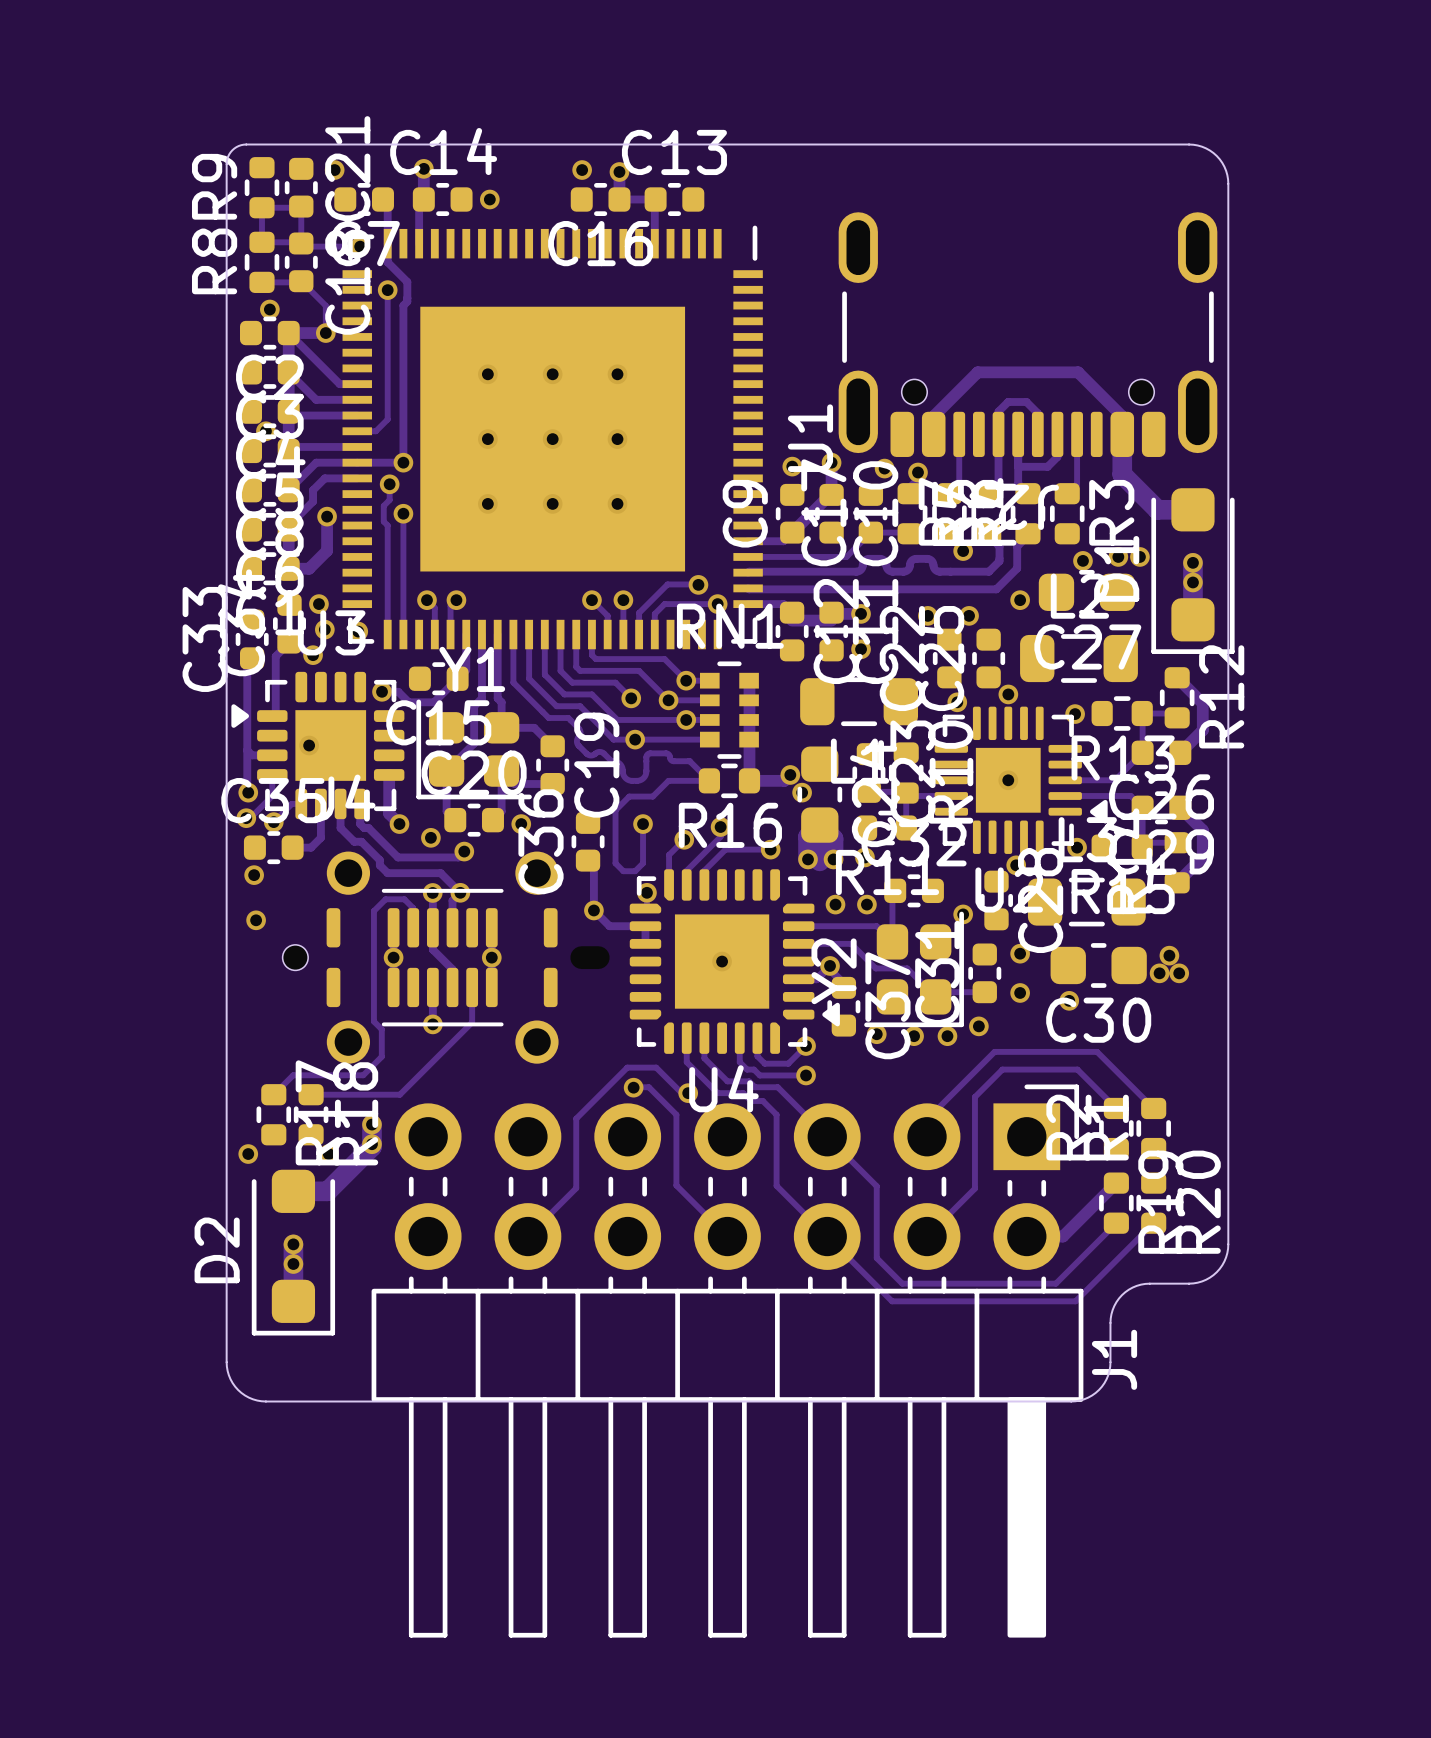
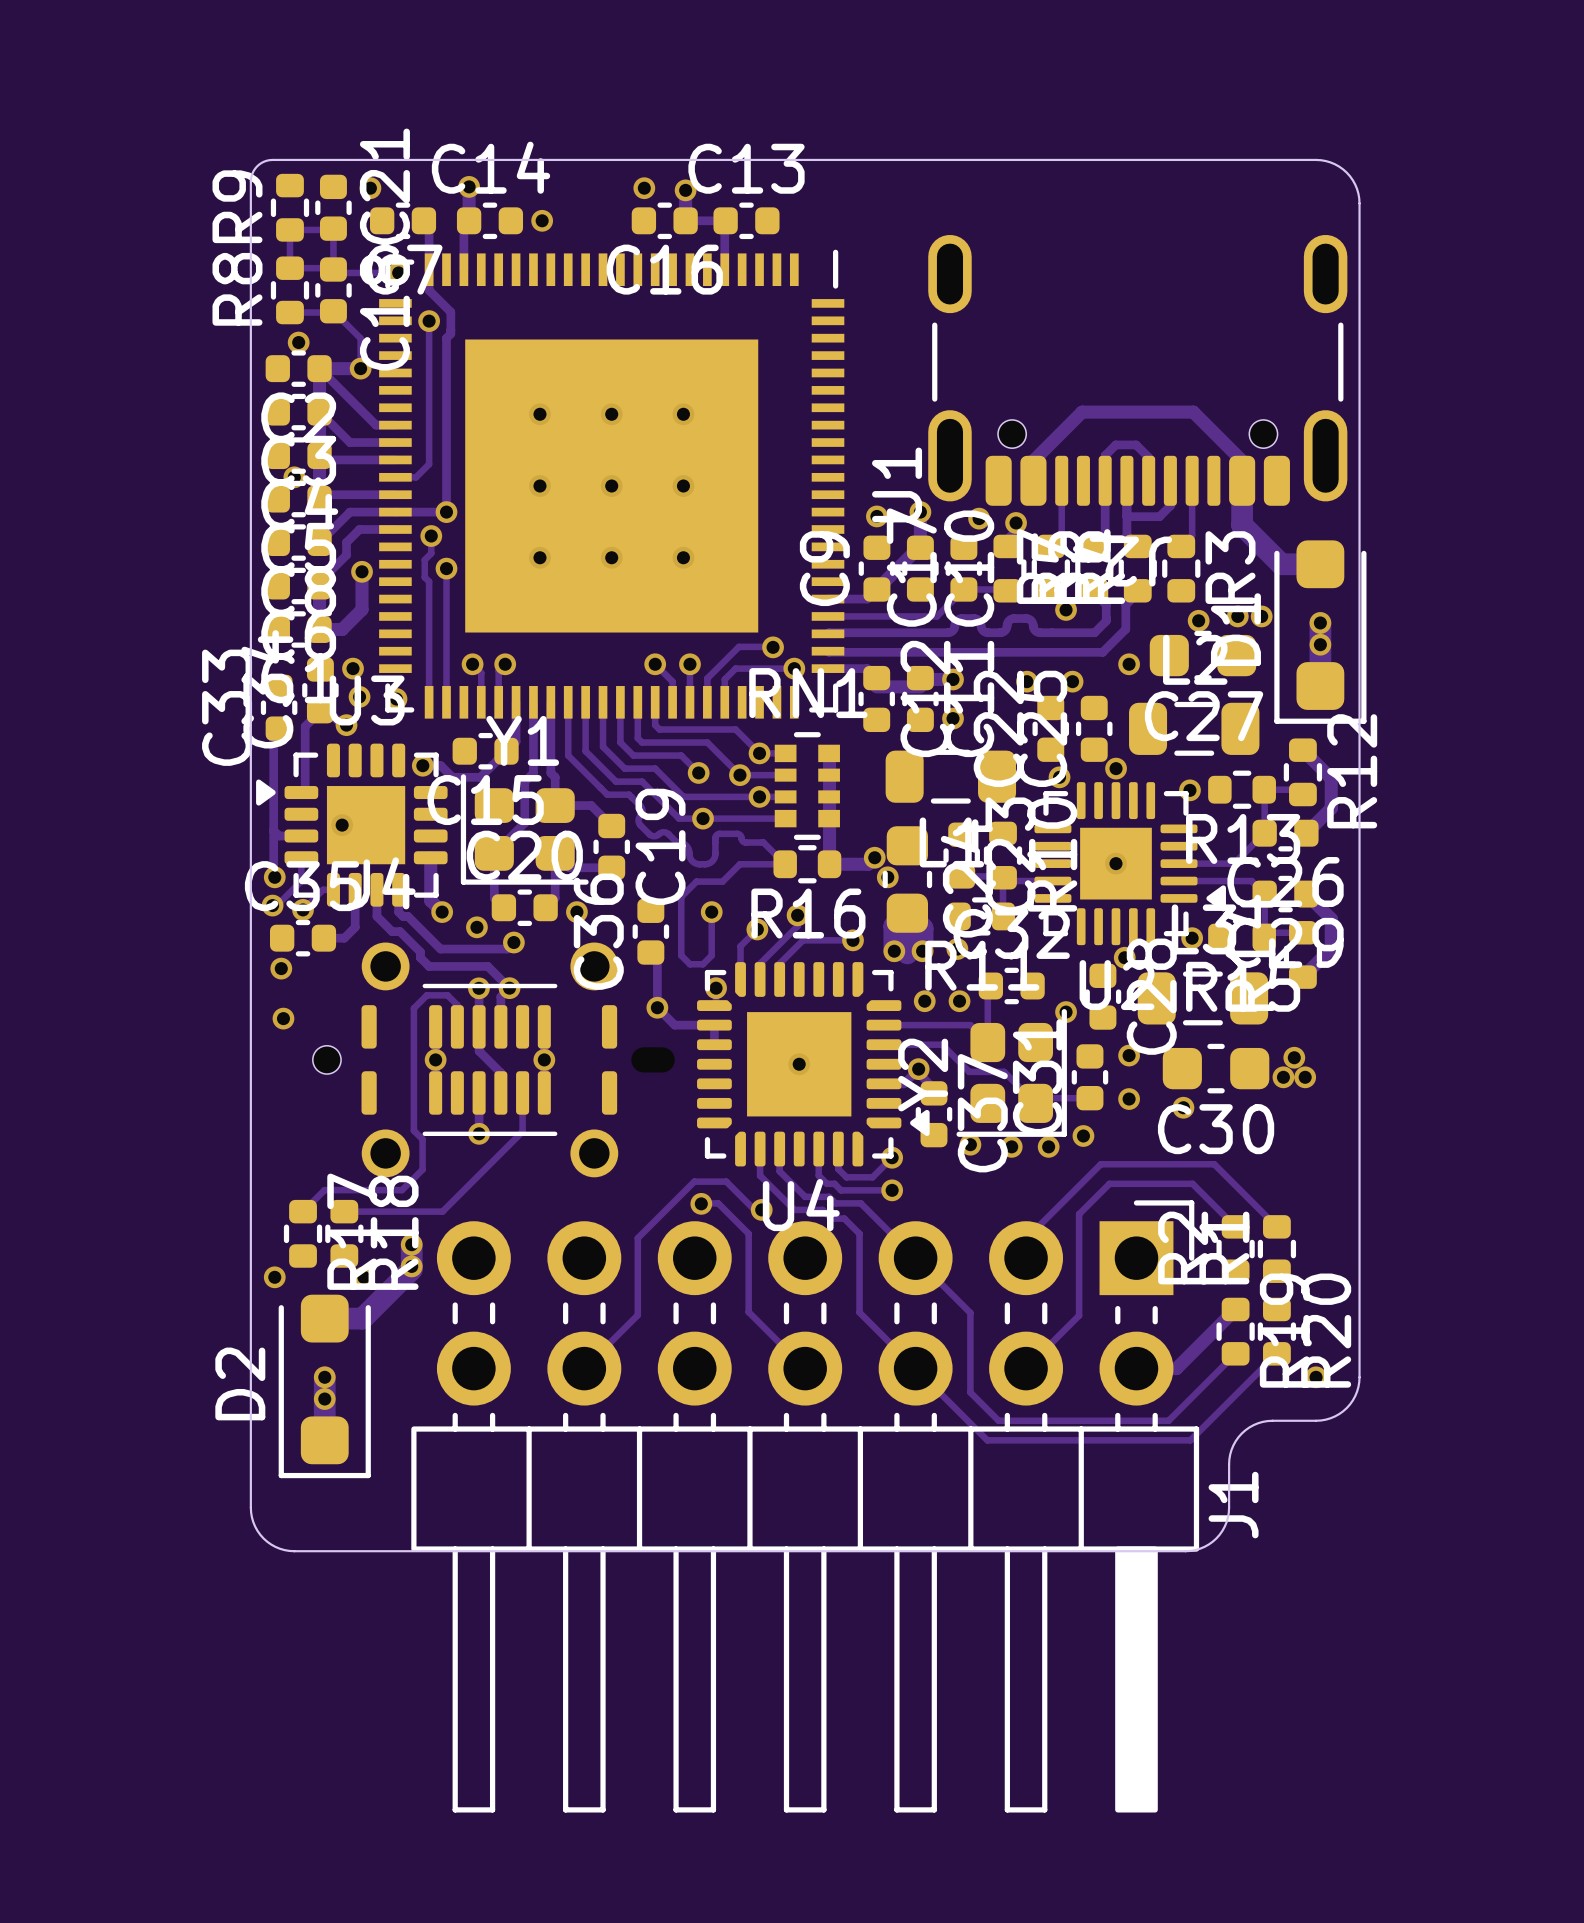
via: none -> (1316, 1377)

